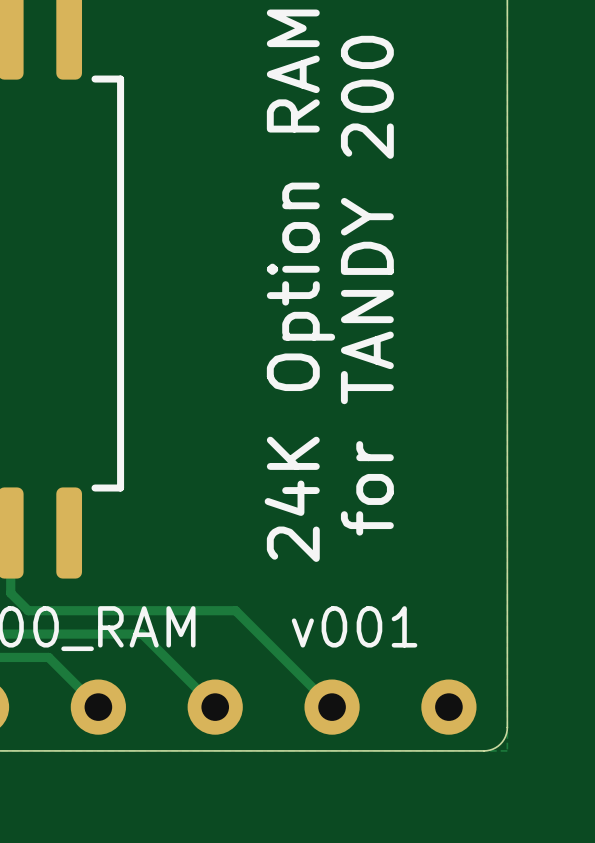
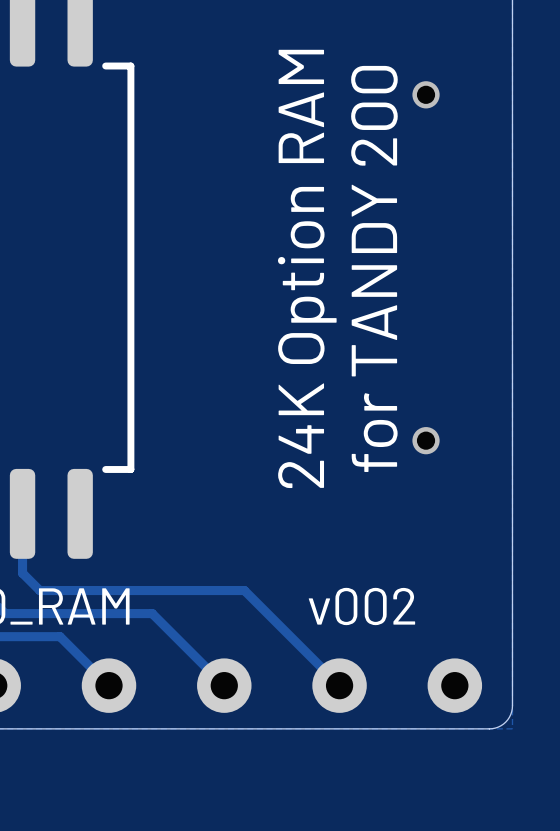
via: none -> (426, 94)
via: none -> (426, 440)
text: v001 (354, 626) -> v002 (361, 606)

